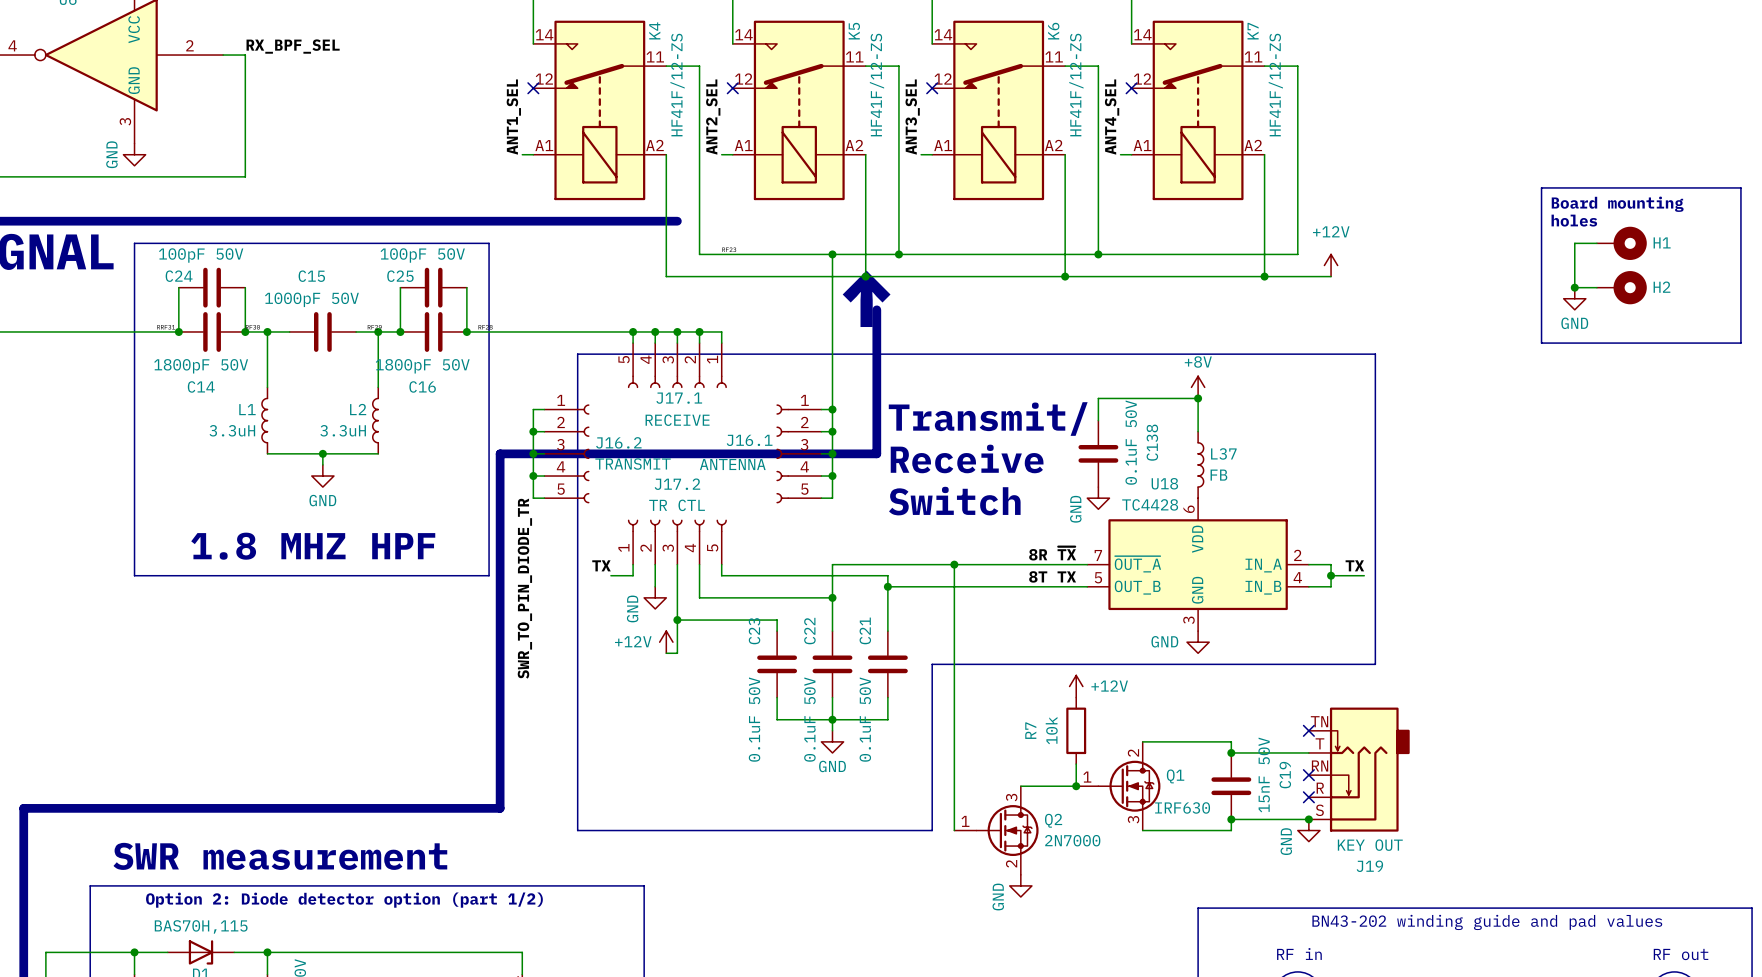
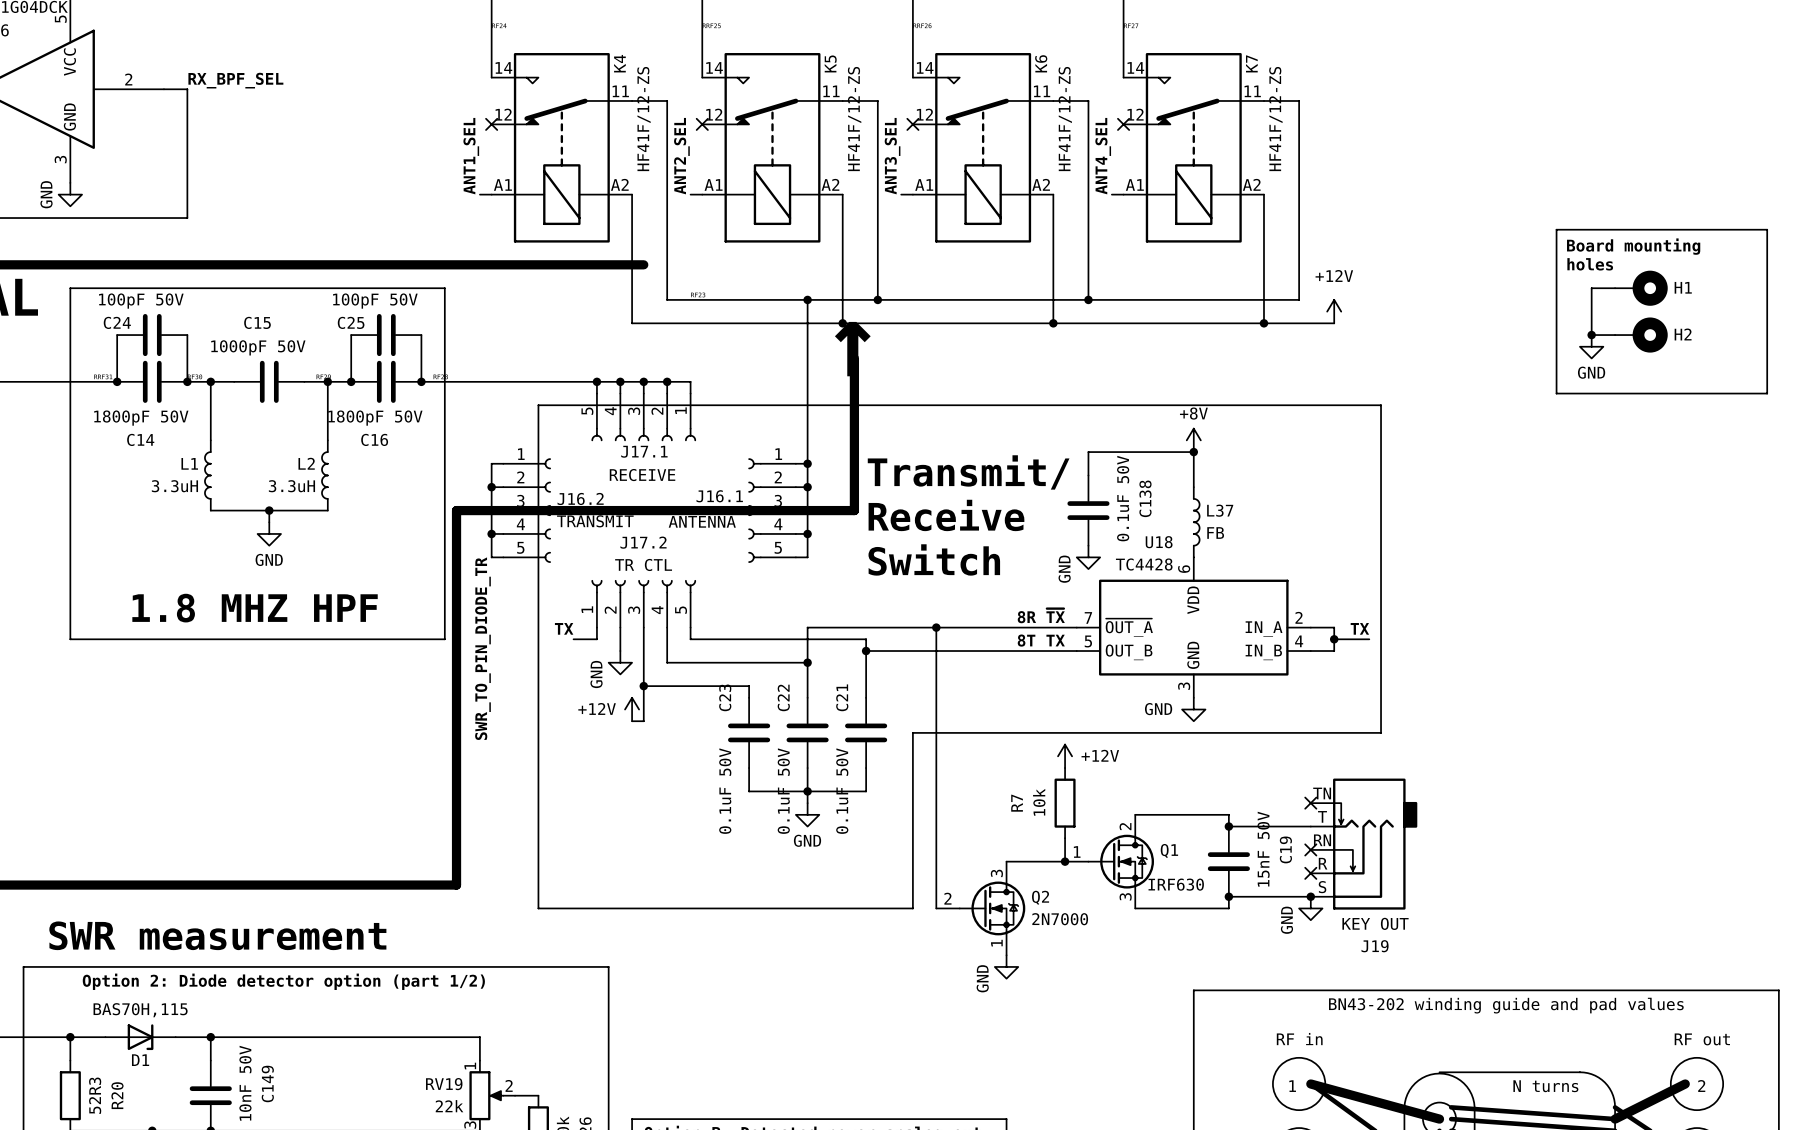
Q2 pin number: 1 (965, 821) -> 2 (947, 898)
Q2 pin number: 2 (1011, 863) -> 1 (996, 943)

